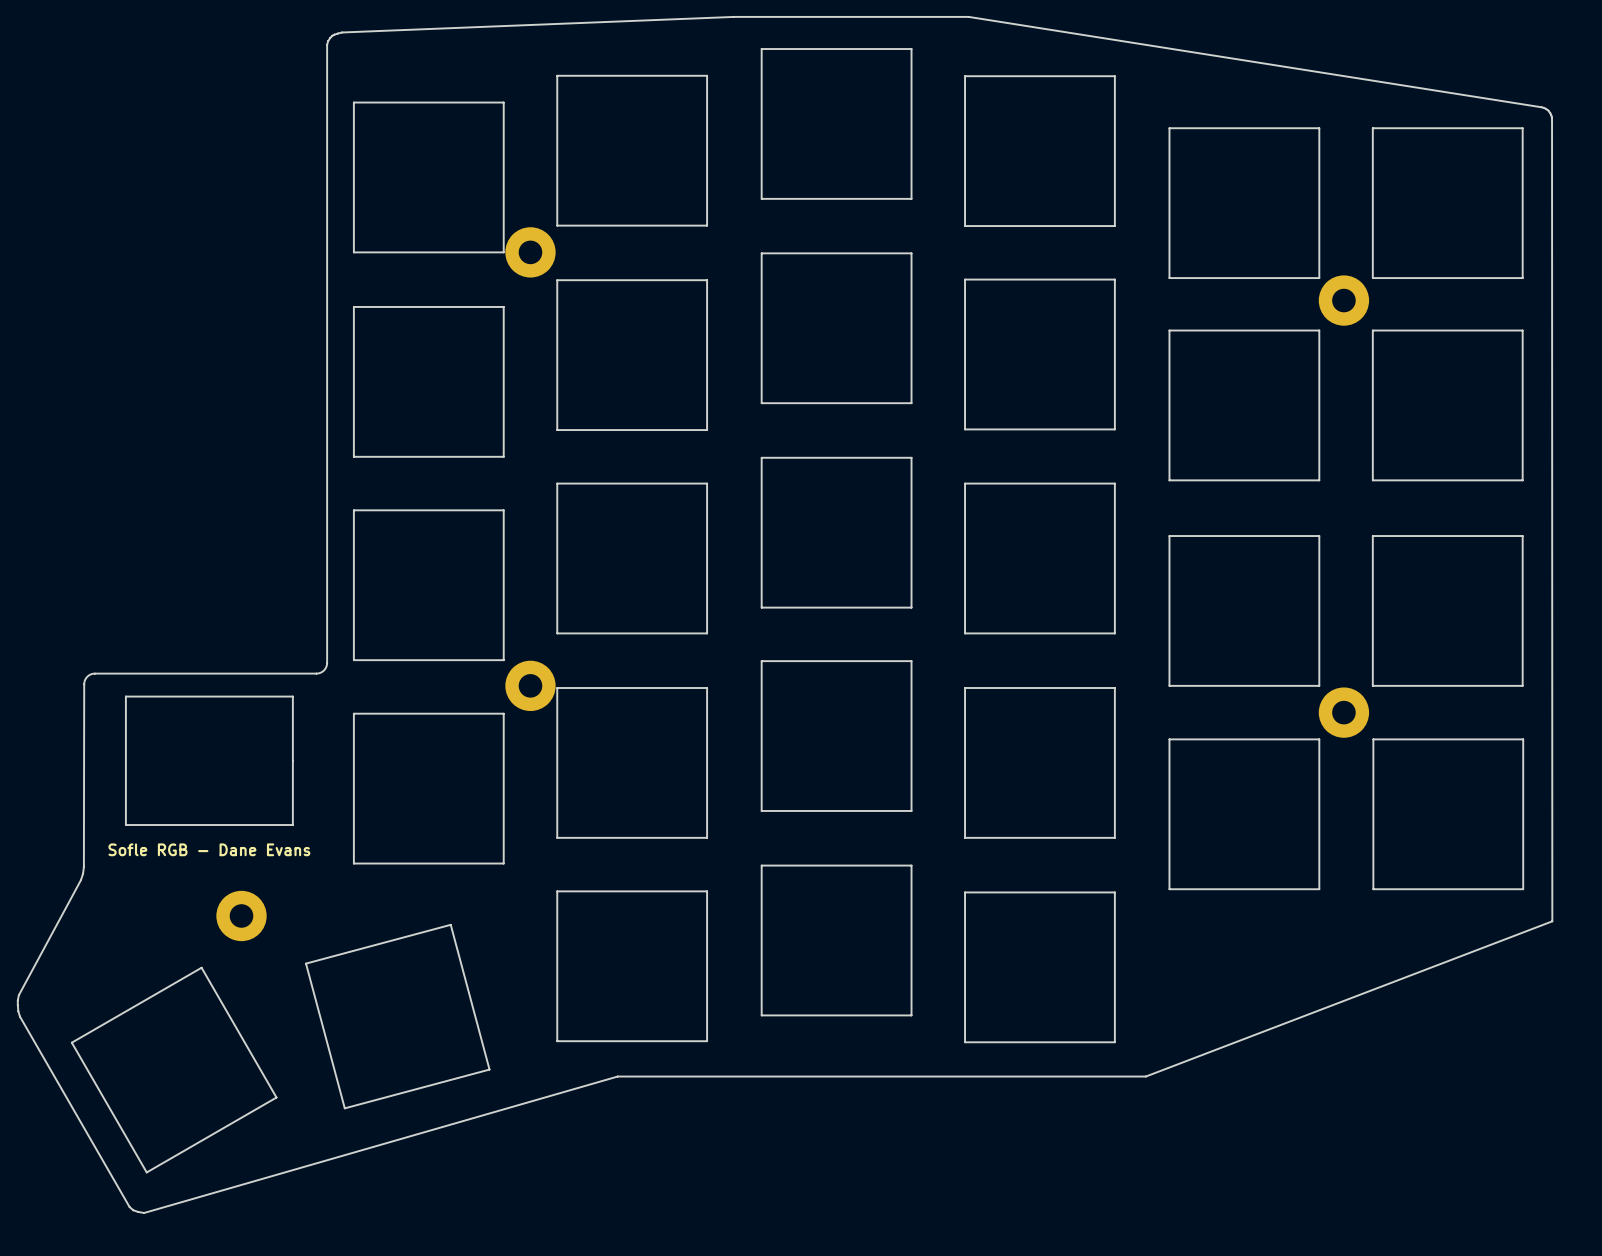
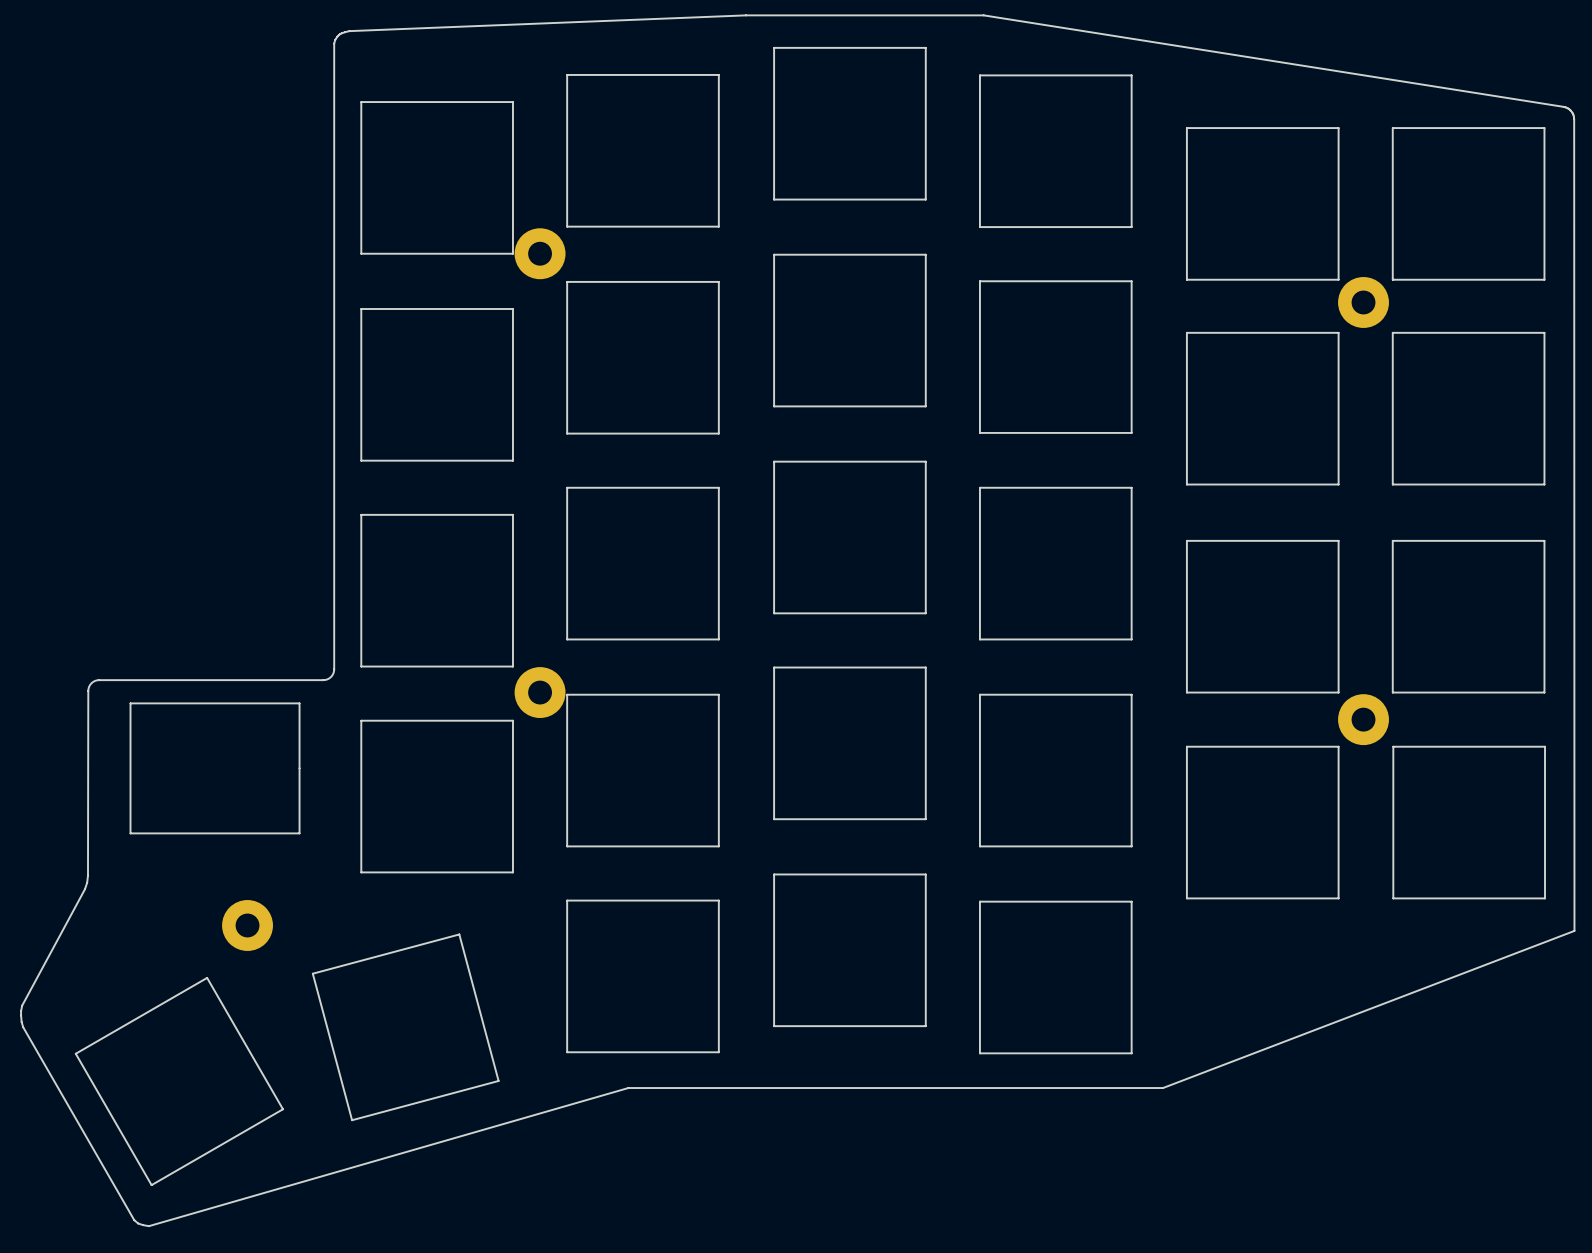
text: Sofle RGB - Dane Evans (209, 849) -> none

